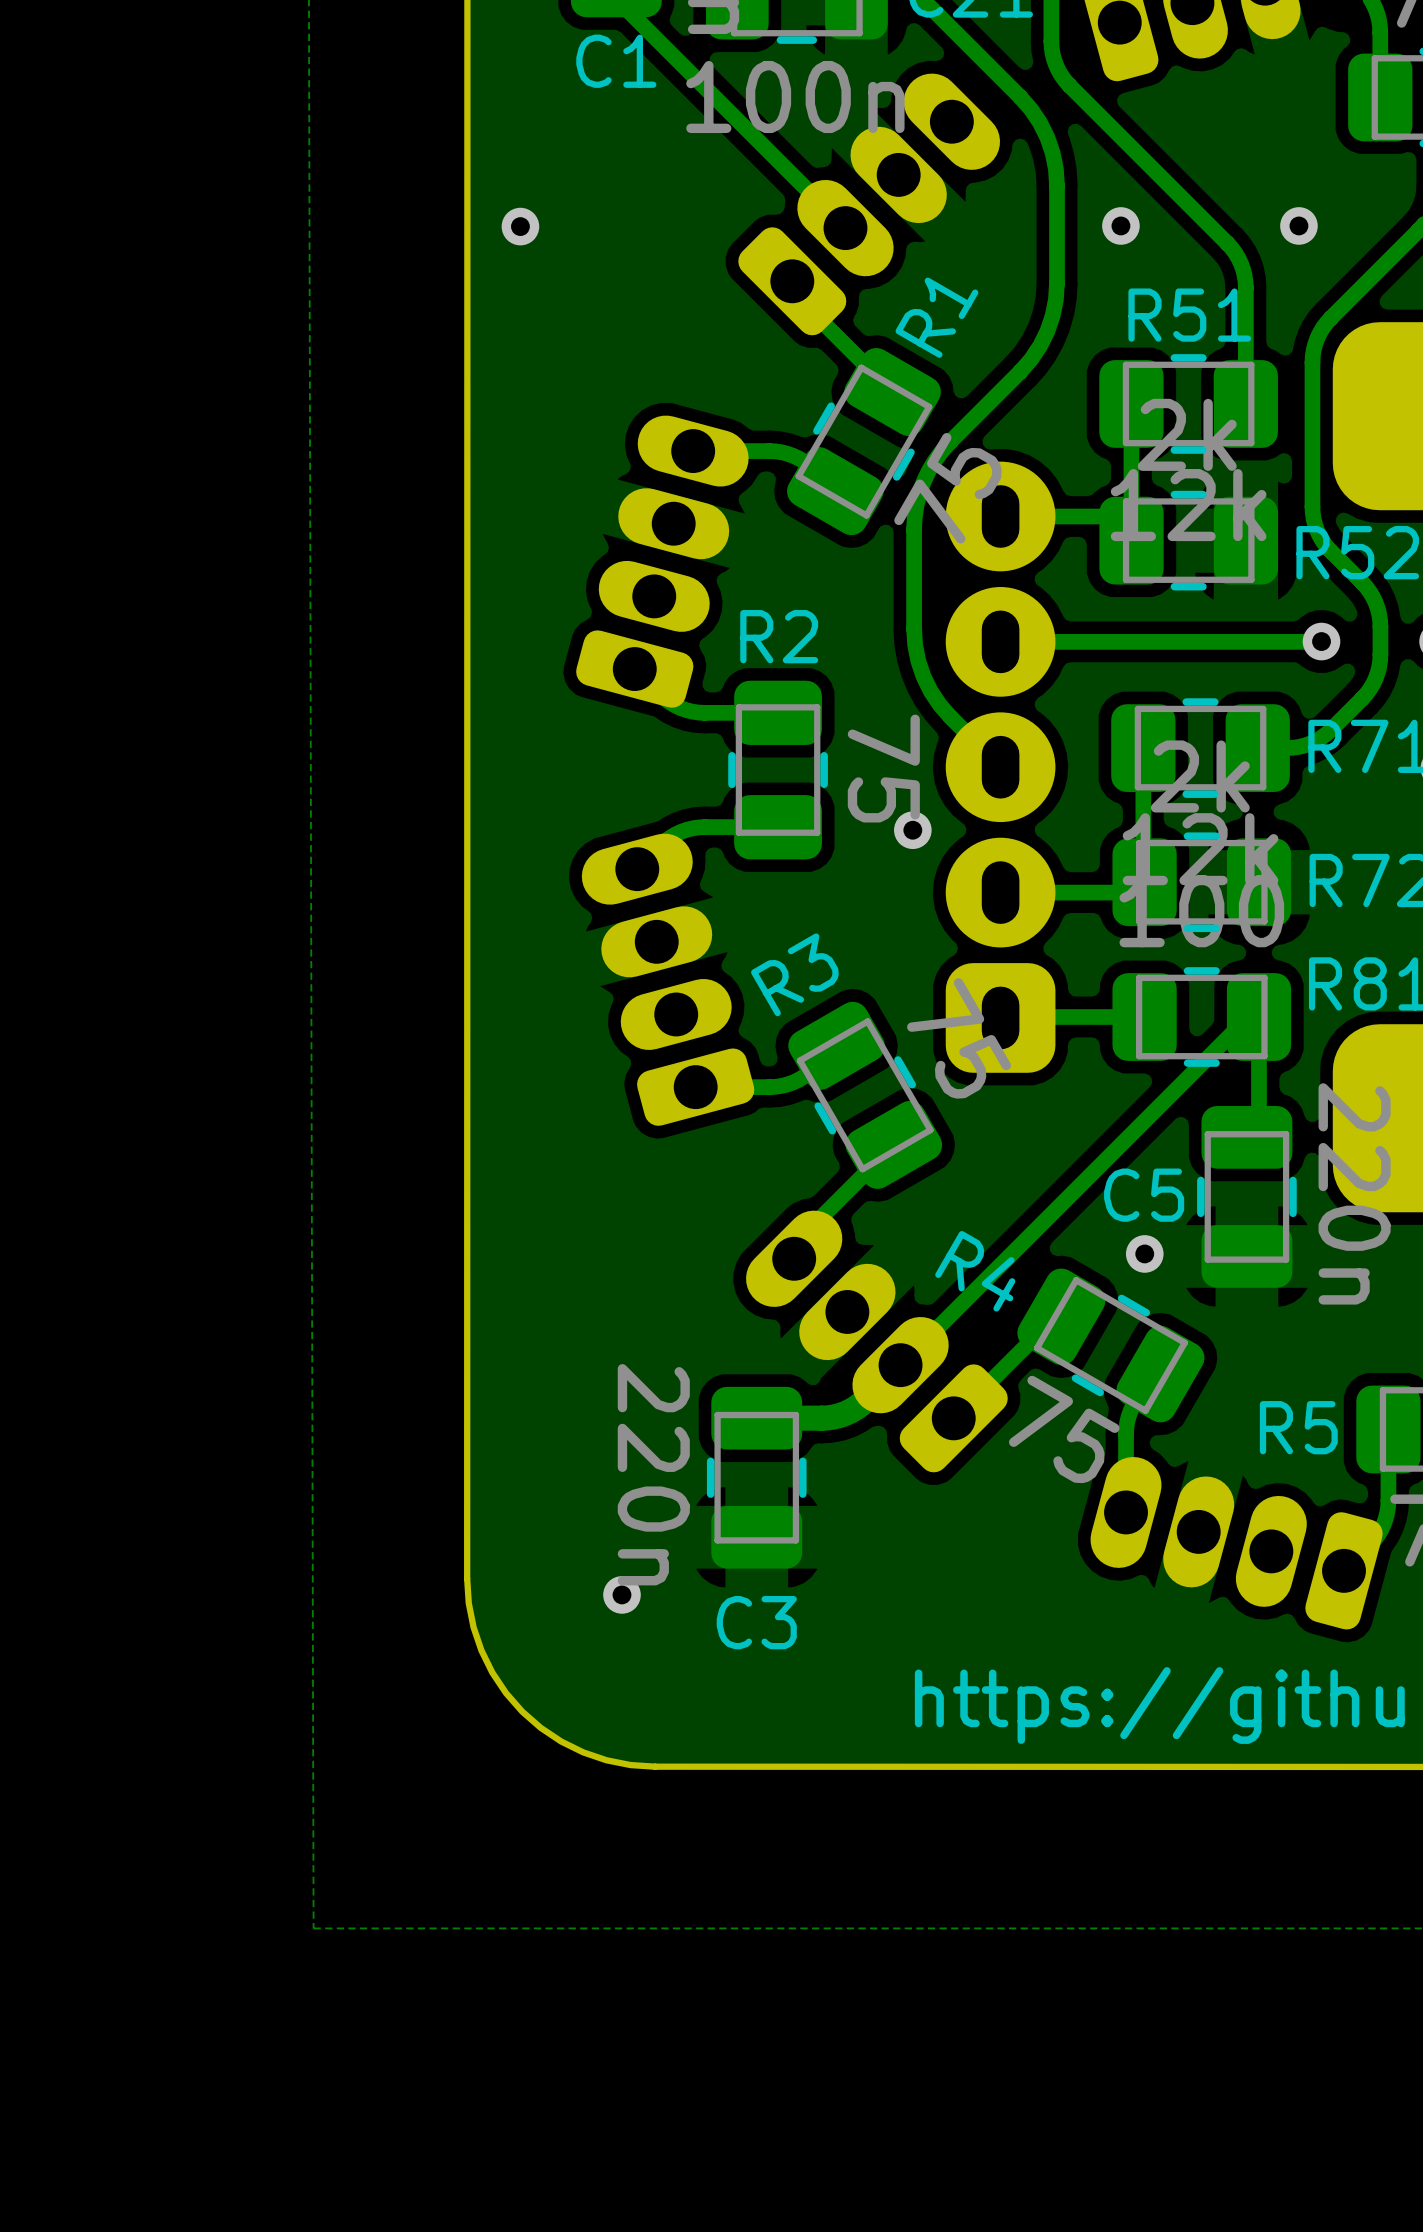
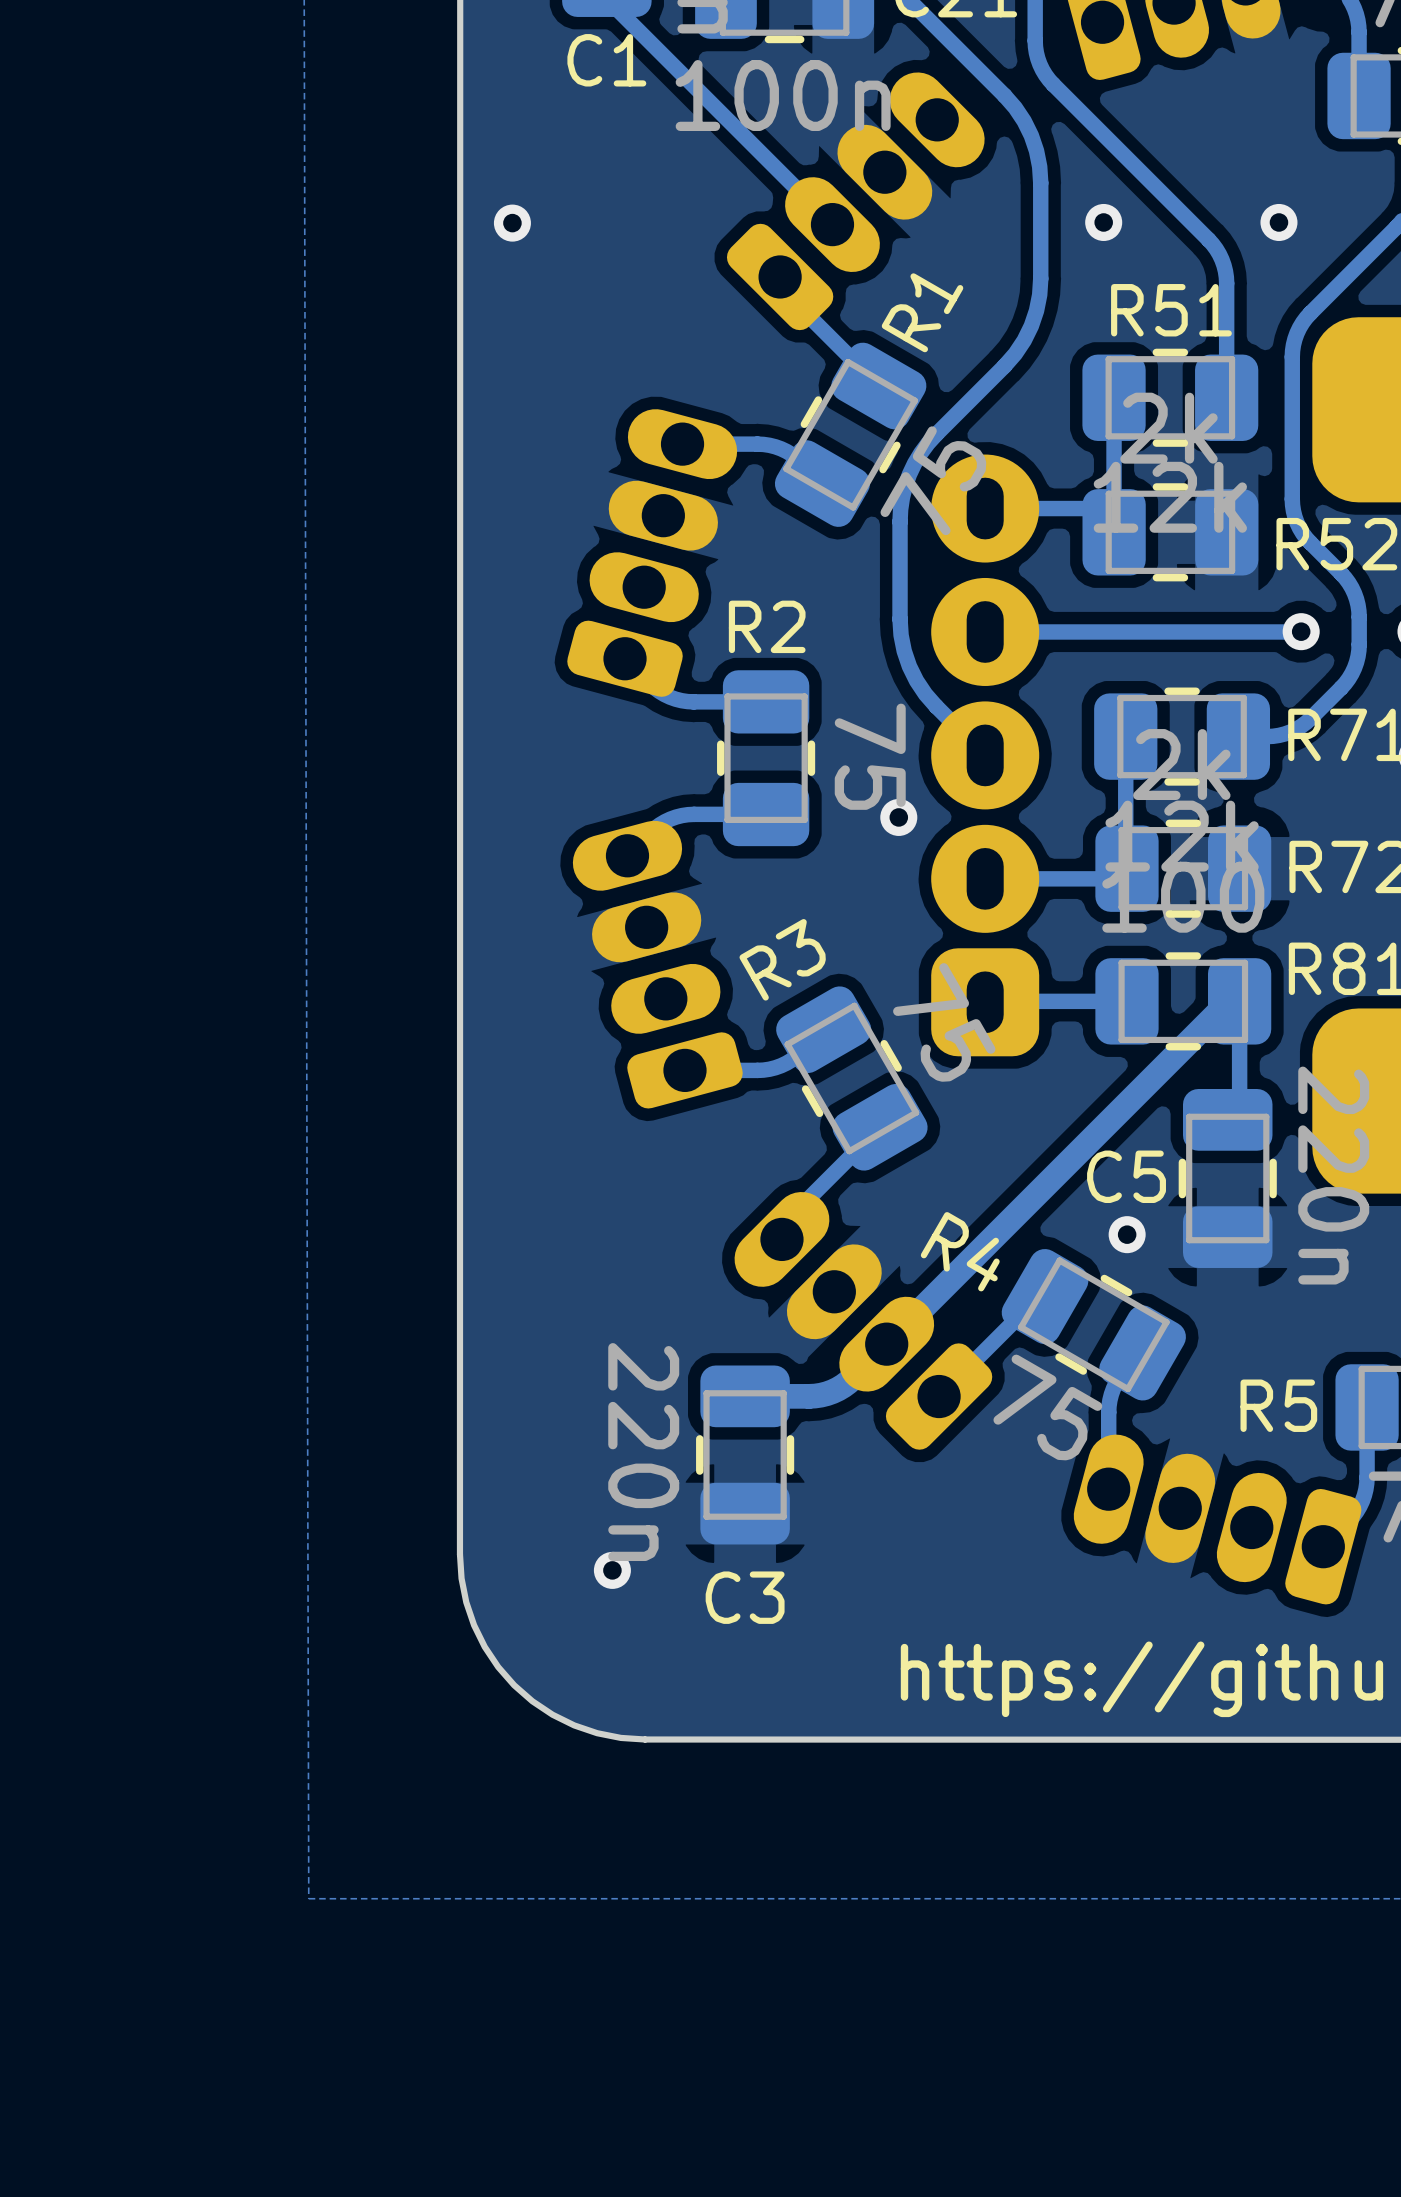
track width: thin (1258, 1017) (1248, 1017) (900, 1365) -> thick (1239, 1001) (1229, 1001) (886, 1344)

